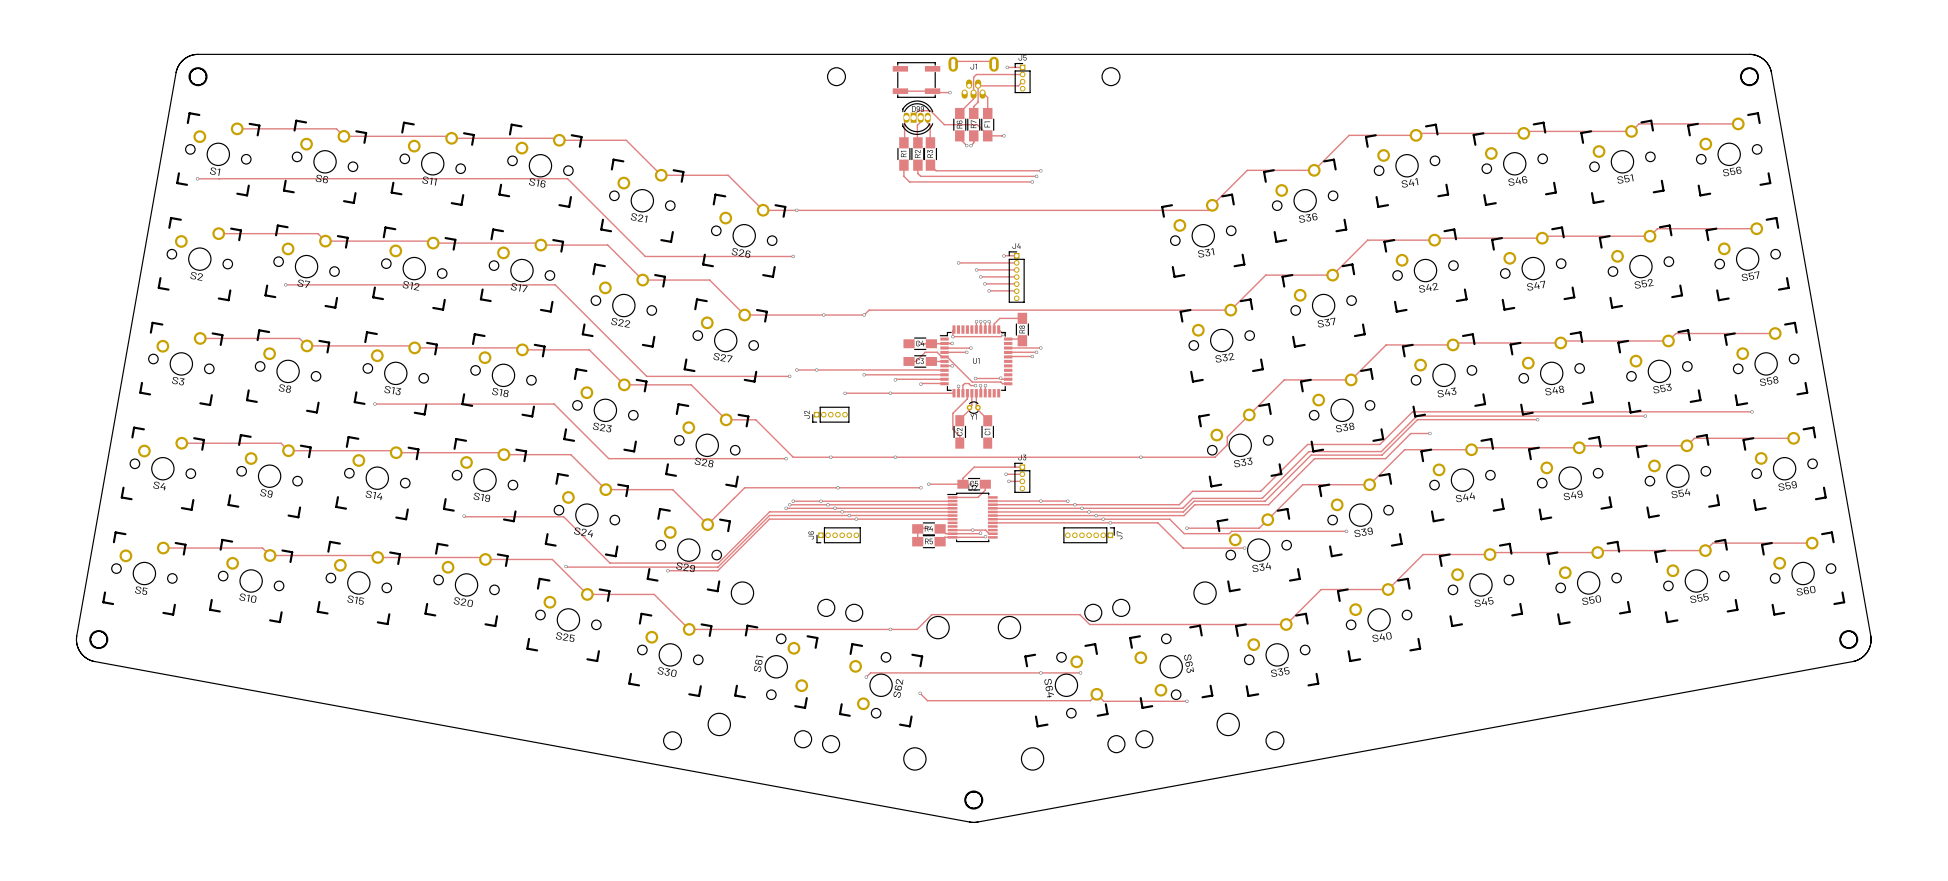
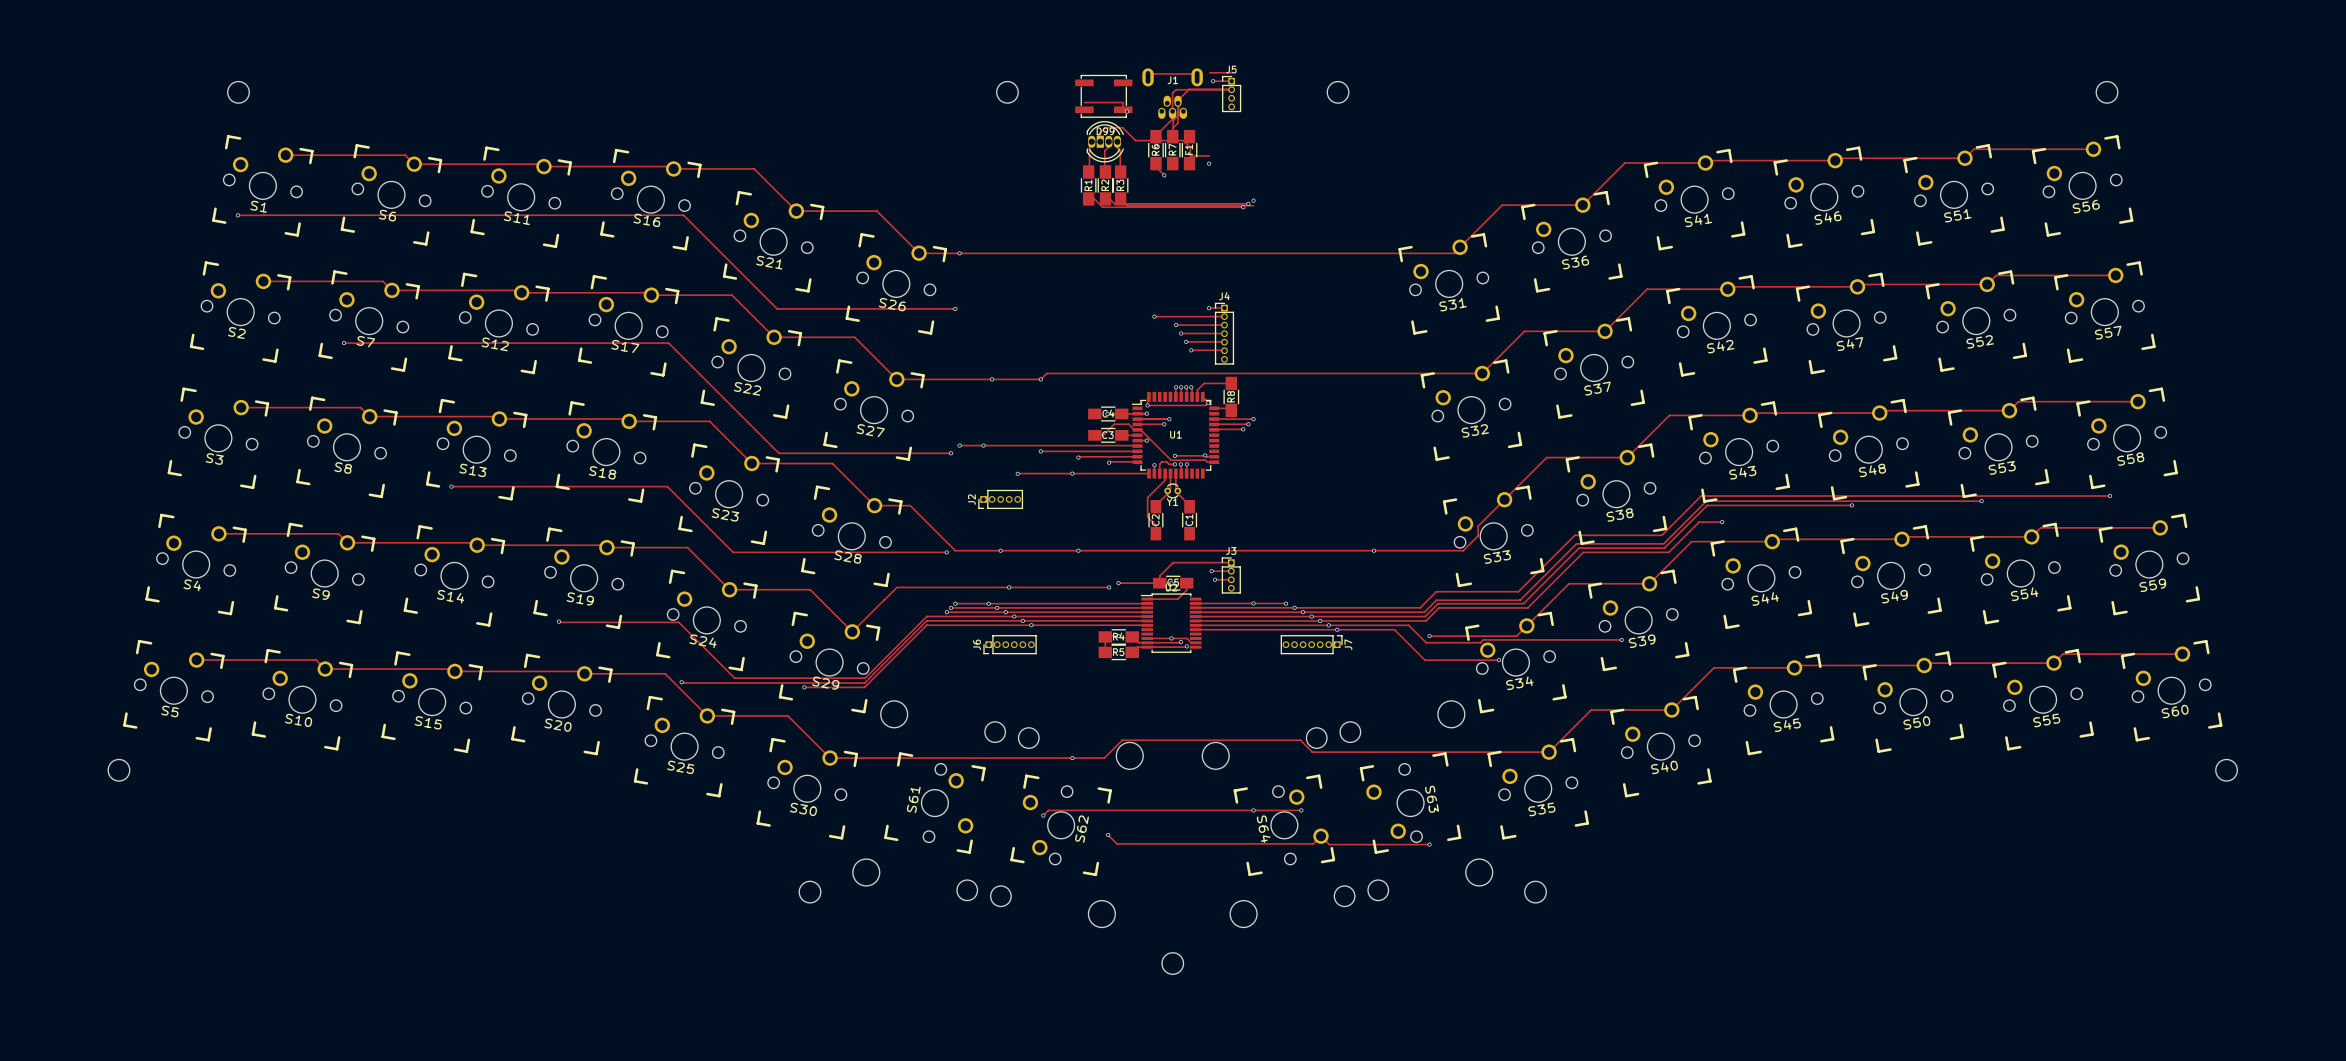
board edge: (197, 54) (1757, 55) (1766, 62) (1771, 72) (1870, 636) (1869, 647) (1862, 656) (1852, 661) (973, 822) (91, 660) (79, 650) (76, 636) (176, 71) (183, 59) (197, 54) -> none
track: none -> (1231, 72) (1209, 72)
board edge: (197, 68) (192, 71) (189, 77) (192, 82) (198, 84) (204, 81) (206, 76) (203, 70) (197, 68) -> none
board edge: (1748, 68) (1743, 71) (1741, 77) (1744, 83) (1750, 84) (1755, 81) (1757, 76) (1754, 70) (1748, 68) -> none
track: none -> (1231, 89) (1189, 89) (1178, 99) (1178, 115) (1173, 120) (1173, 129)
track: (1022, 81) (1018, 85) (976, 85) -> none
track: none -> (1084, 102) (1123, 102) (1123, 107)
track: (900, 91) (950, 92) -> none
via position: (950, 92) -> (1127, 111)
track: (982, 92) (987, 97) (987, 113) -> none
track: none -> (1099, 135) (1105, 127) (1122, 127) (1135, 140) (1183, 140) (1190, 147) (1190, 155) (1209, 155)
track: (913, 117) (918, 110) (930, 110) (944, 124) (977, 124) (987, 135) (1003, 135) -> none
via: none -> (1156, 145)
track: (973, 135) (973, 142) (970, 145) -> none
via: (970, 145) -> none
track: none -> (1089, 194) (1102, 207) (1243, 207)
track: none -> (1104, 194) (1114, 203) (1248, 203)
track: (903, 165) (903, 176) (909, 181) (1032, 181) -> none
track: (917, 165) (917, 173) (920, 176) (1036, 176) -> none
via: none -> (1253, 200)
via: none -> (1248, 203)
via: (1040, 170) -> none
via: none -> (1243, 207)
via: (1036, 176) -> none
via: (1032, 181) -> none
board edge: (98, 631) (104, 633) (107, 639) (104, 645) (98, 647) (93, 645) (90, 639) (93, 633) (98, 631) -> none
board edge: (1848, 631) (1854, 633) (1856, 639) (1854, 645) (1848, 647) (1842, 645) (1840, 639) (1842, 633) (1848, 631) -> none
board edge: (973, 791) (979, 794) (982, 799) (980, 805) (974, 808) (968, 806) (965, 800) (967, 794) (973, 791) -> none

